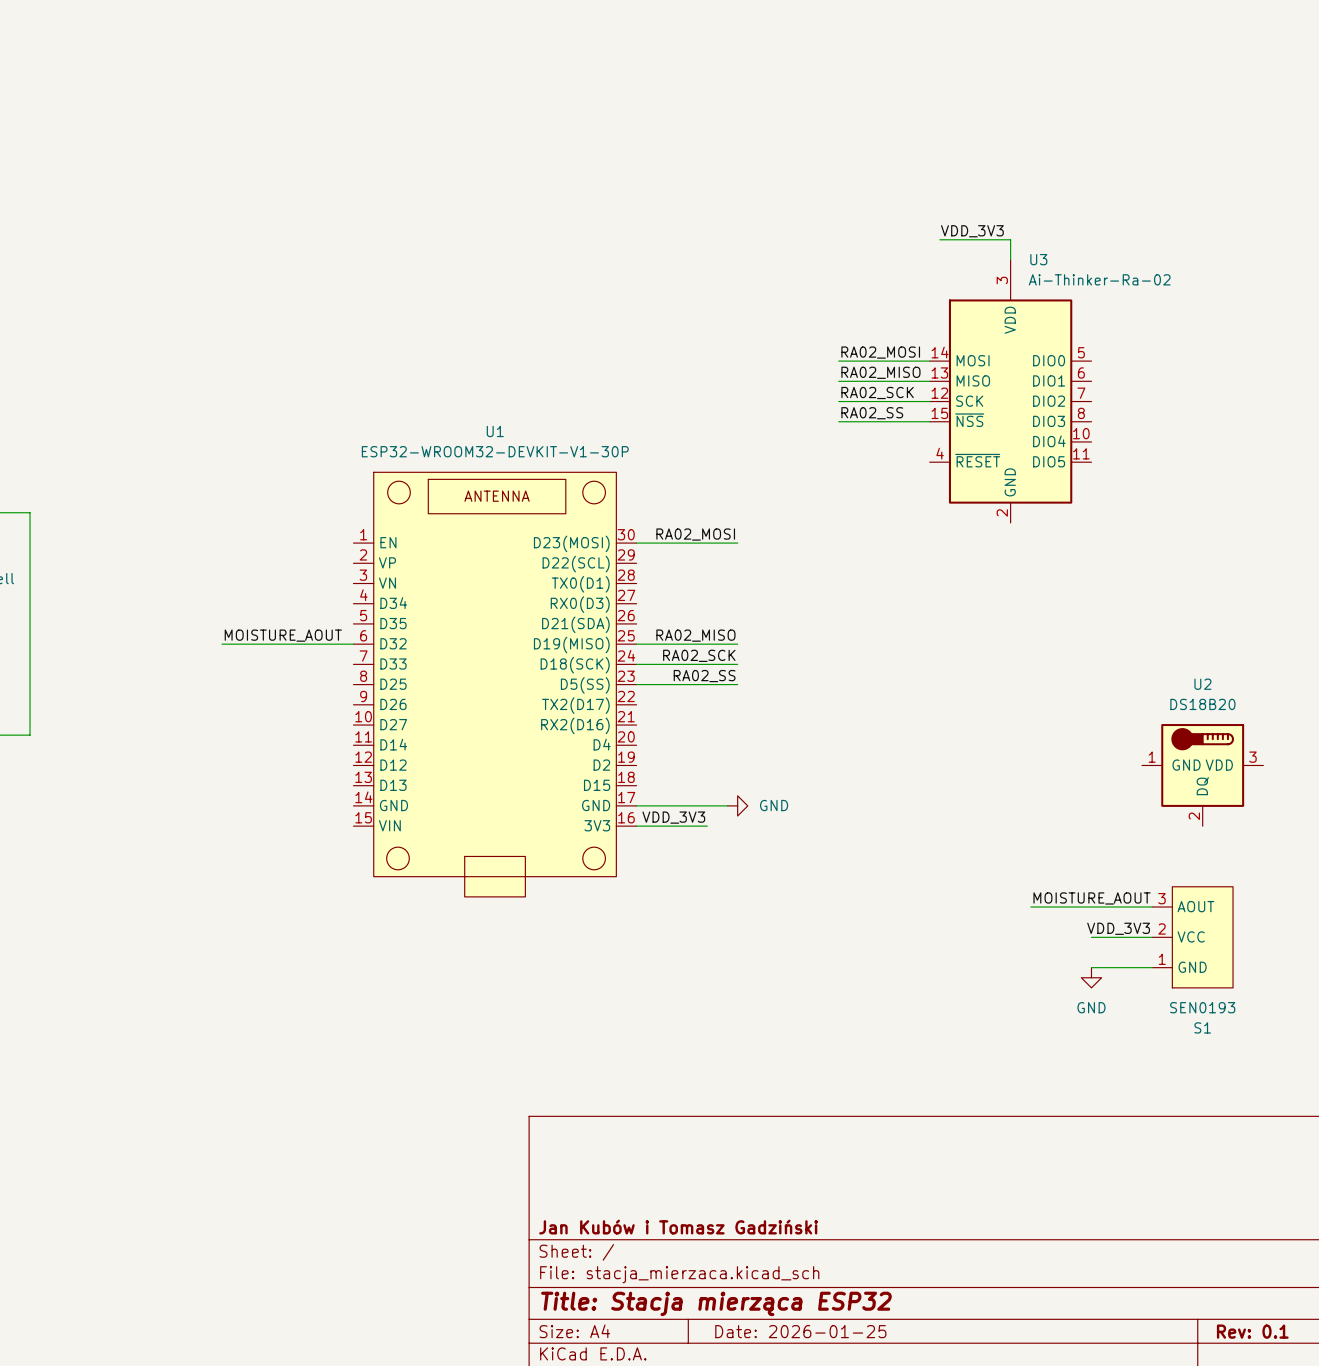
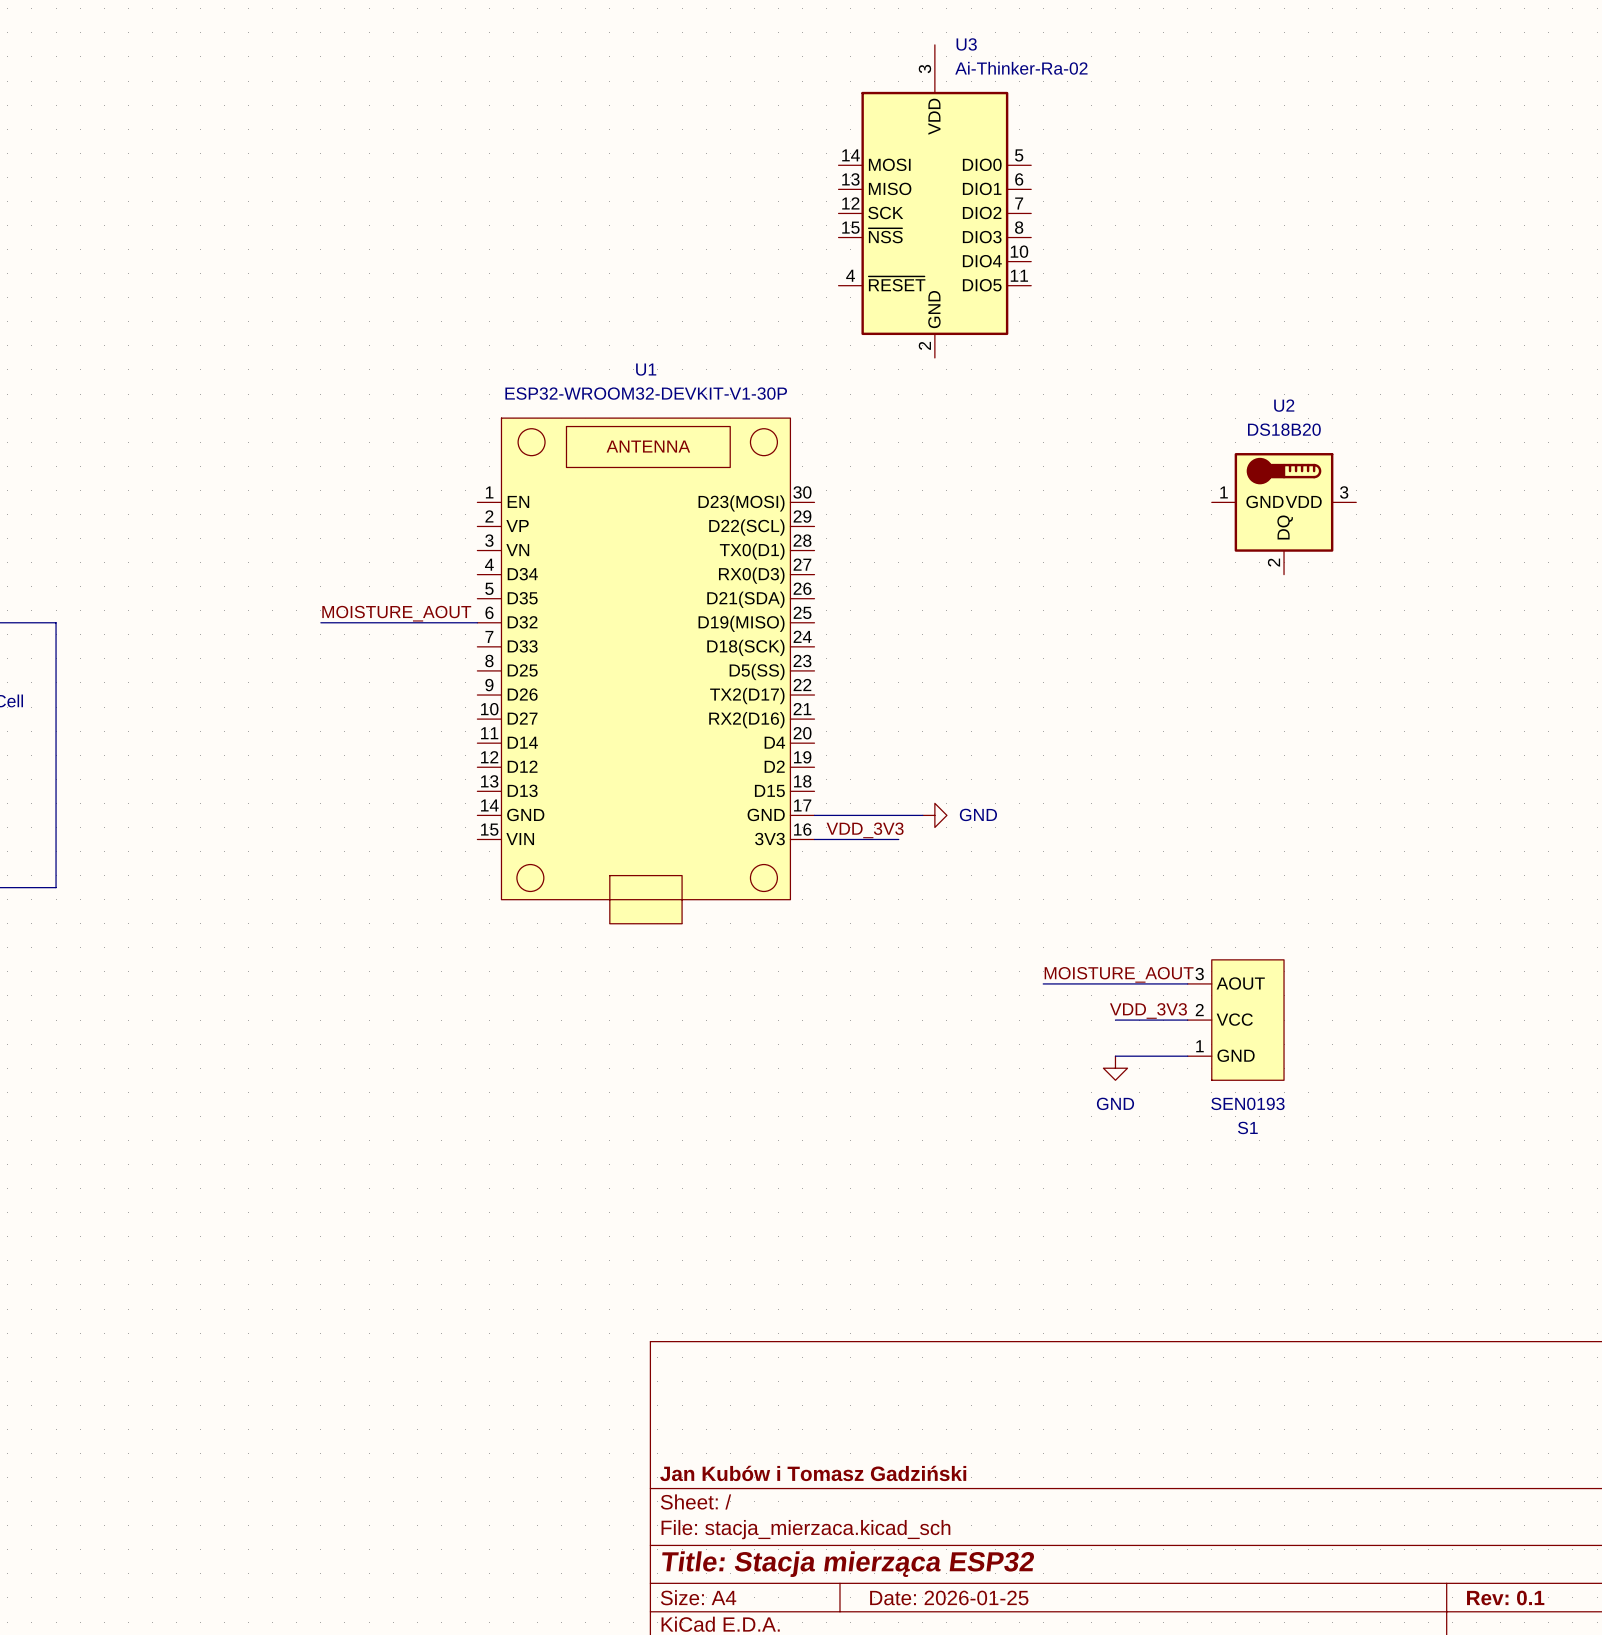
label: VDD_3V3 (972, 231) -> none
wire: (939, 239) (1010, 239) (1010, 260) -> none
label: RA02_MOSI (880, 352) -> none
wire: (838, 361) (929, 361) -> none
label: RA02_MISO (880, 372) -> none
wire: (838, 381) (929, 381) -> none
U3 position: (1010, 391) -> (934, 201)
label: RA02_SCK (877, 393) -> none
wire: (838, 401) (929, 401) -> none
label: RA02_SS (872, 413) -> none
wire: (838, 421) (929, 421) -> none
label: RA02_MOSI (695, 534) -> none
wire: (636, 543) (737, 543) -> none
label position: MOISTURE_AOUT (283, 635) -> MOISTURE_AOUT (396, 613)
label: RA02_MISO (695, 635) -> none
wire: (222, 644) (353, 644) -> (320, 622) (477, 622)
wire: (636, 644) (737, 644) -> none
label: RA02_SCK (699, 655) -> none
wire: (636, 664) (737, 664) -> none
power symbol: none -> GND (934, 815)
label: RA02_SS (704, 676) -> none
U1 position: (495, 684) -> (645, 670)
wire: (636, 684) (737, 684) -> none
U2 position: (1202, 775) -> (1284, 513)
wire: (636, 805) (727, 805) -> (814, 815) (922, 815)
power symbol: GND (737, 805) -> none
label position: VDD_3V3 (673, 817) -> VDD_3V3 (865, 830)
wire: (636, 826) (707, 826) -> (814, 839) (898, 839)
label: none -> VDD_3V3 (1148, 1010)
power symbol: none -> GND (1115, 1068)
label position: MOISTURE_AOUT (1092, 898) -> MOISTURE_AOUT (1119, 974)
wire: (1030, 907) (1152, 907) -> (1043, 983) (1187, 983)
label: VDD_3V3 (1118, 928) -> none
wire: (1091, 937) (1152, 937) -> (1115, 1020) (1187, 1020)
S1 position: (1192, 937) -> (1235, 1020)
wire: (1091, 967) (1152, 967) -> (1115, 1056) (1187, 1056)
power symbol: GND (1091, 977) -> none

